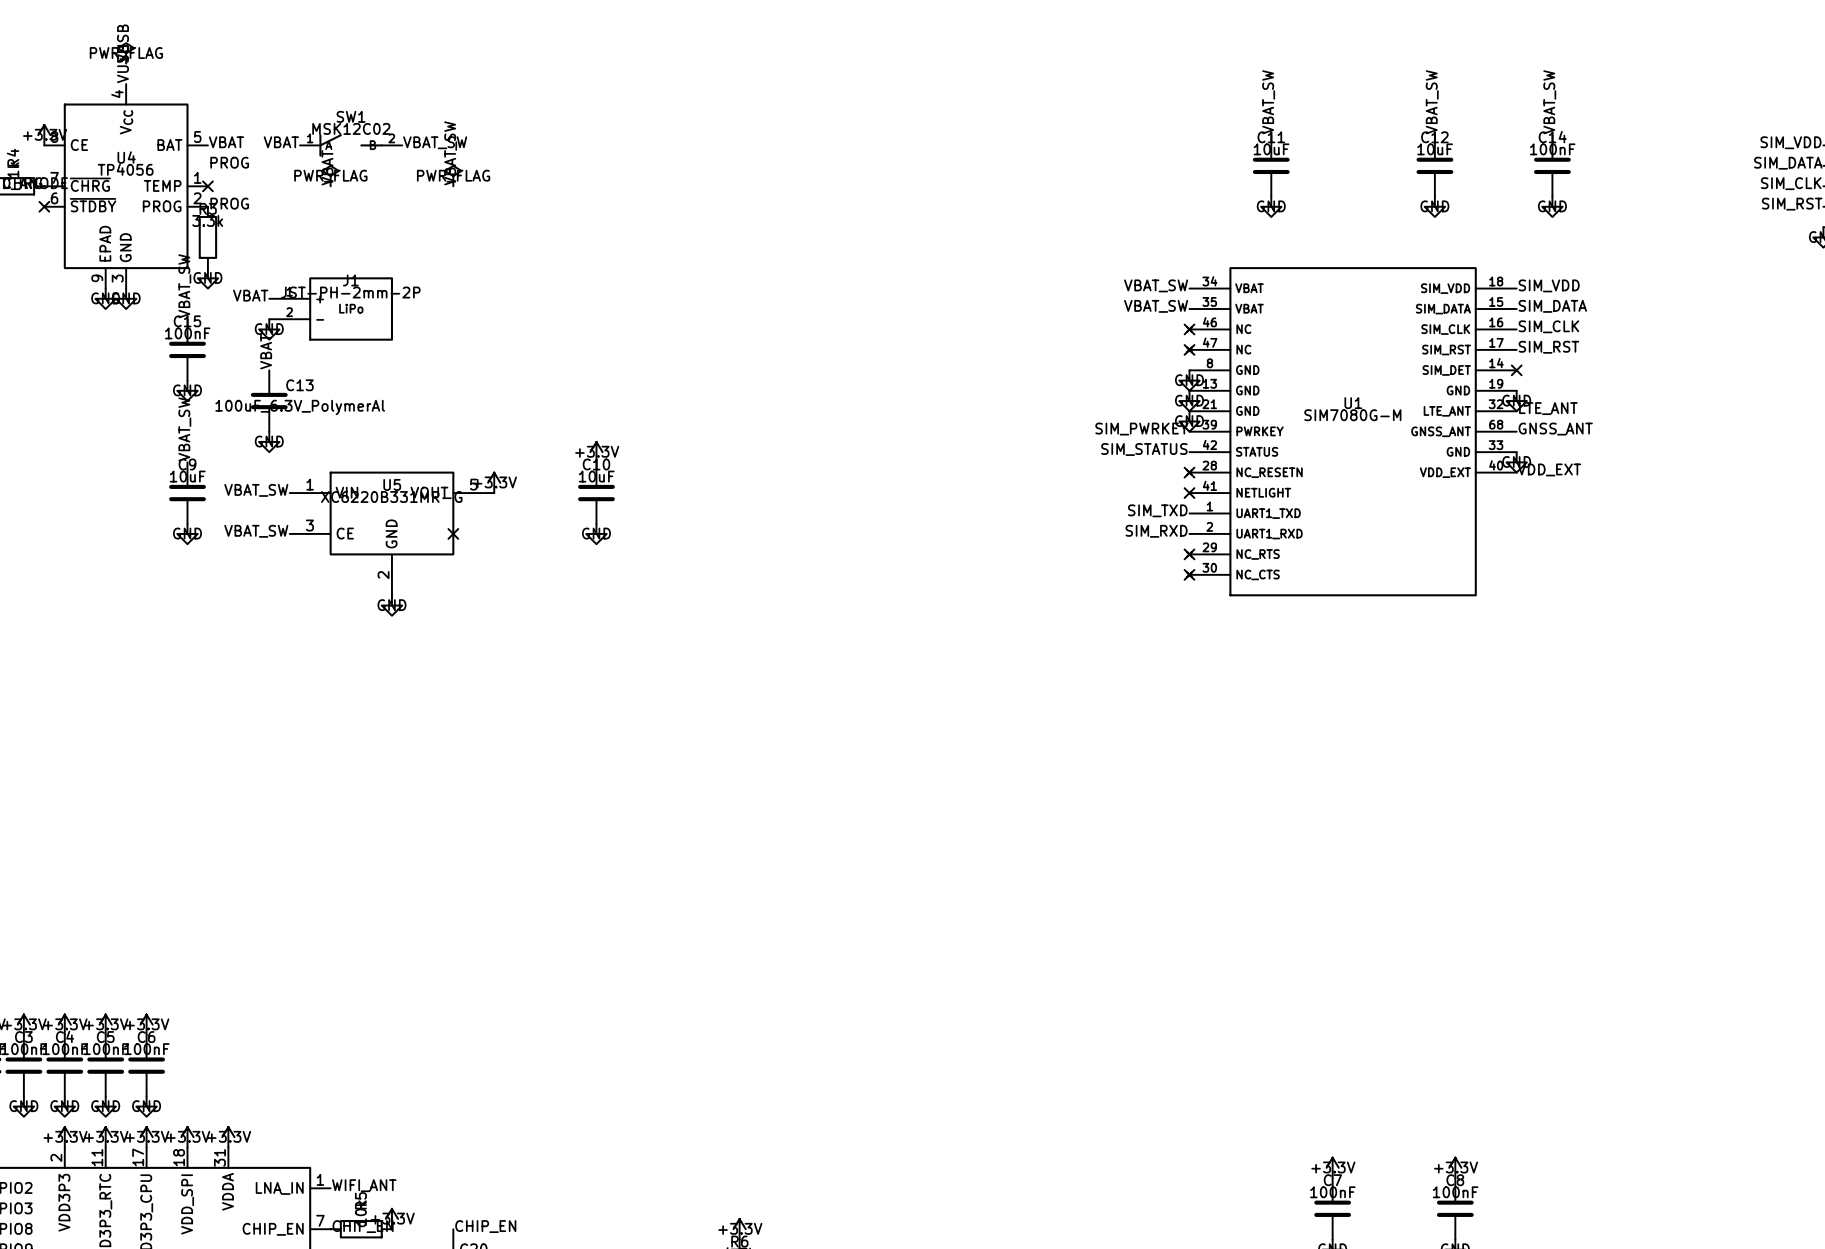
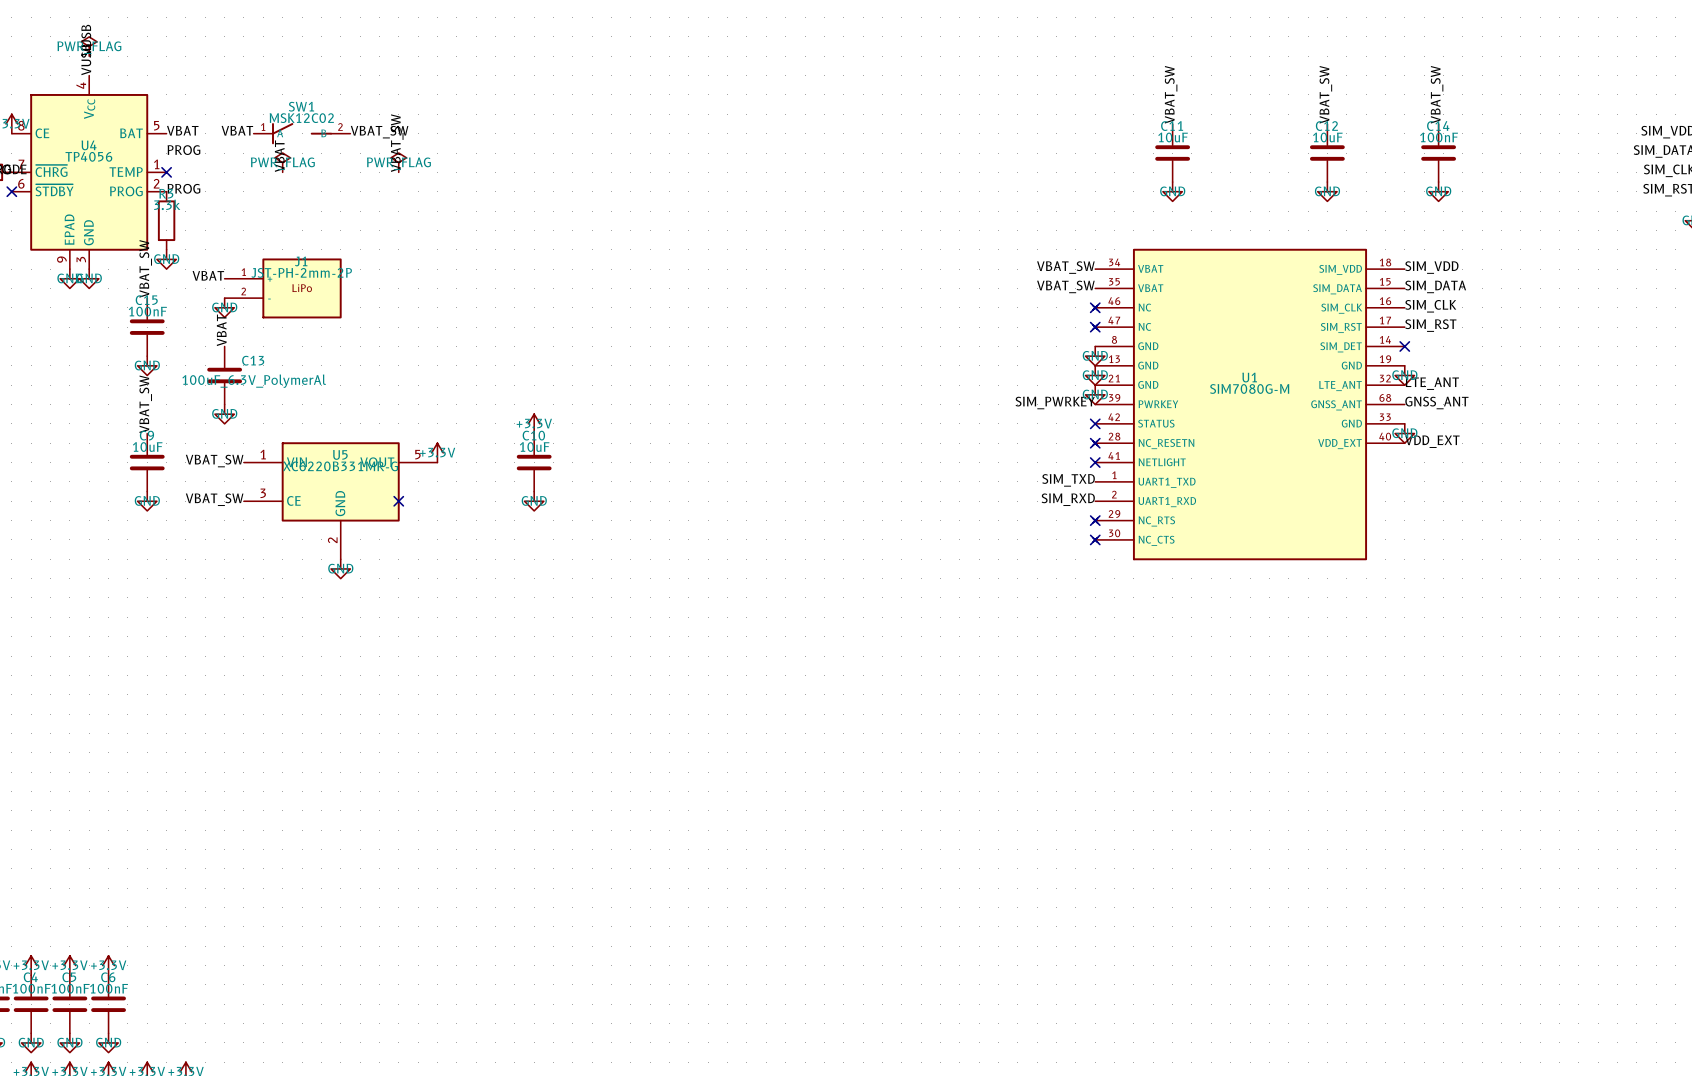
label: SIM_STATUS (1144, 449) -> none
no-connect mark: none -> (1095, 423)

